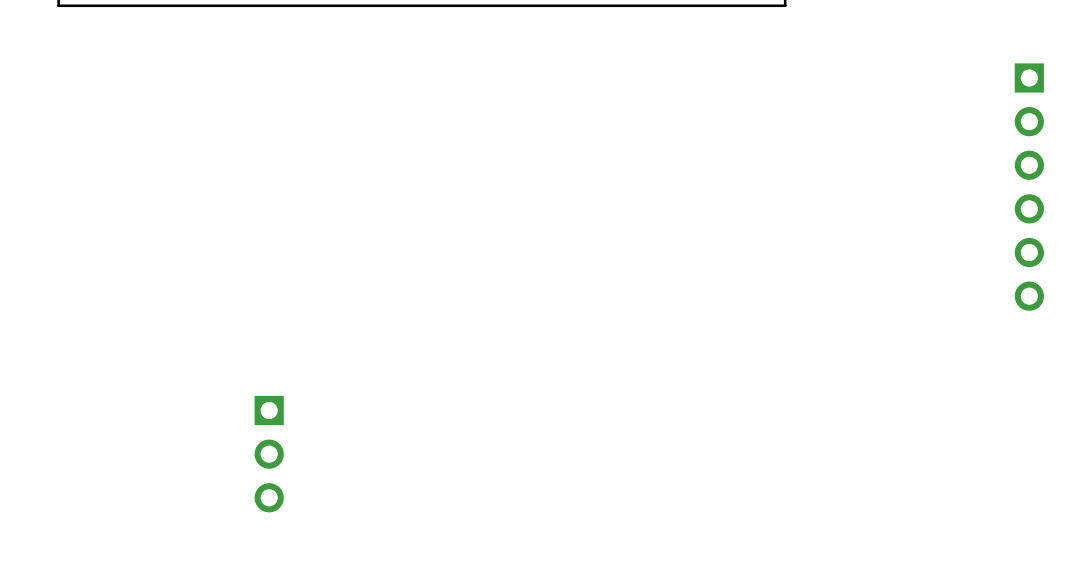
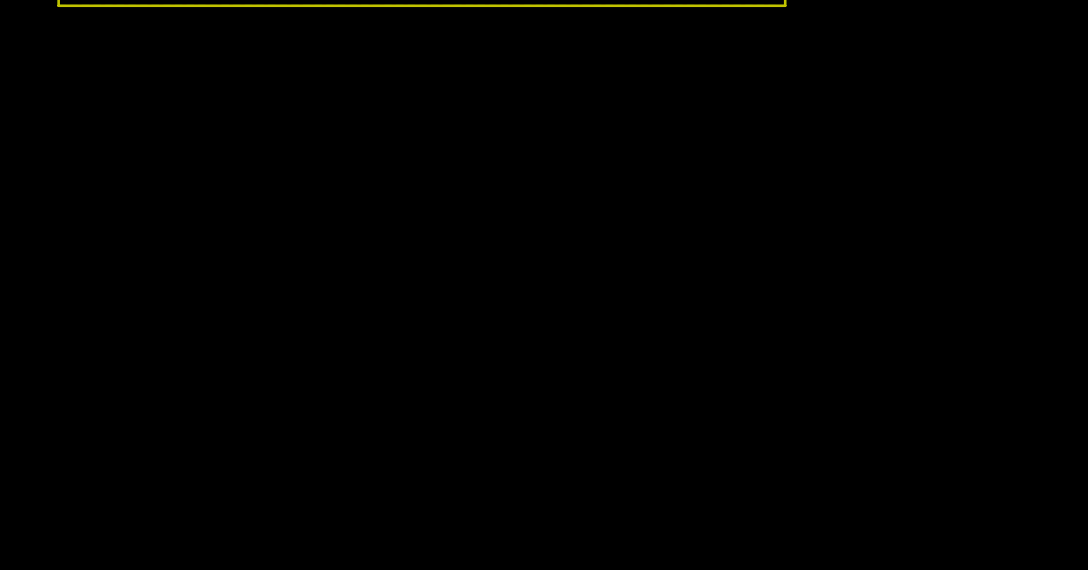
part: (1029, 187) -> none
part: (269, 454) -> none

